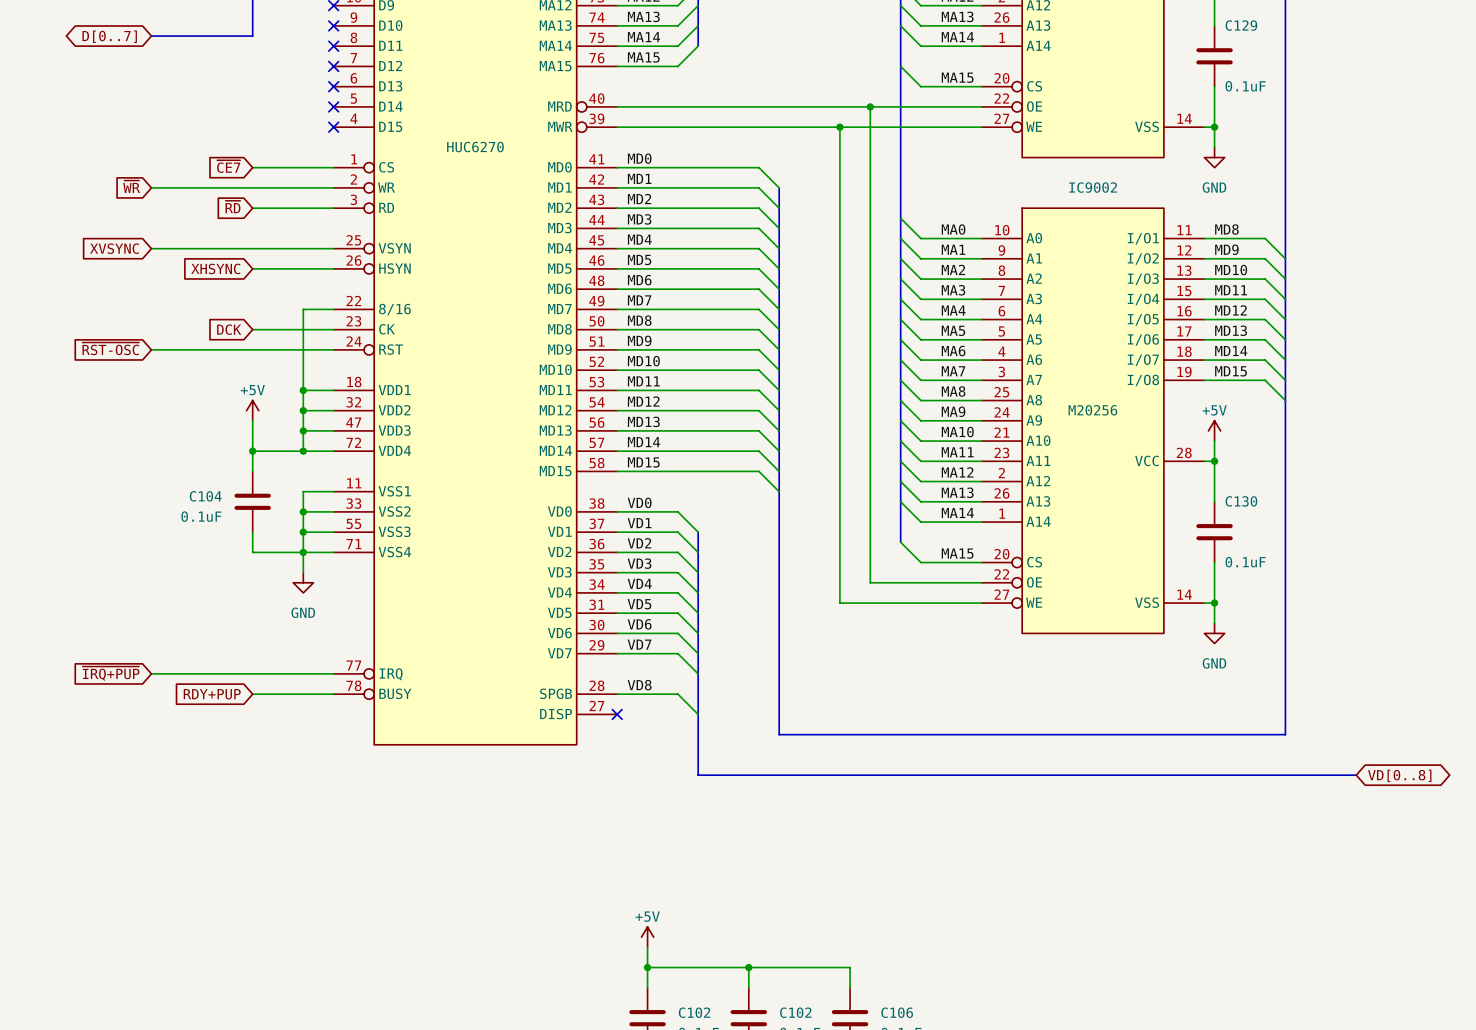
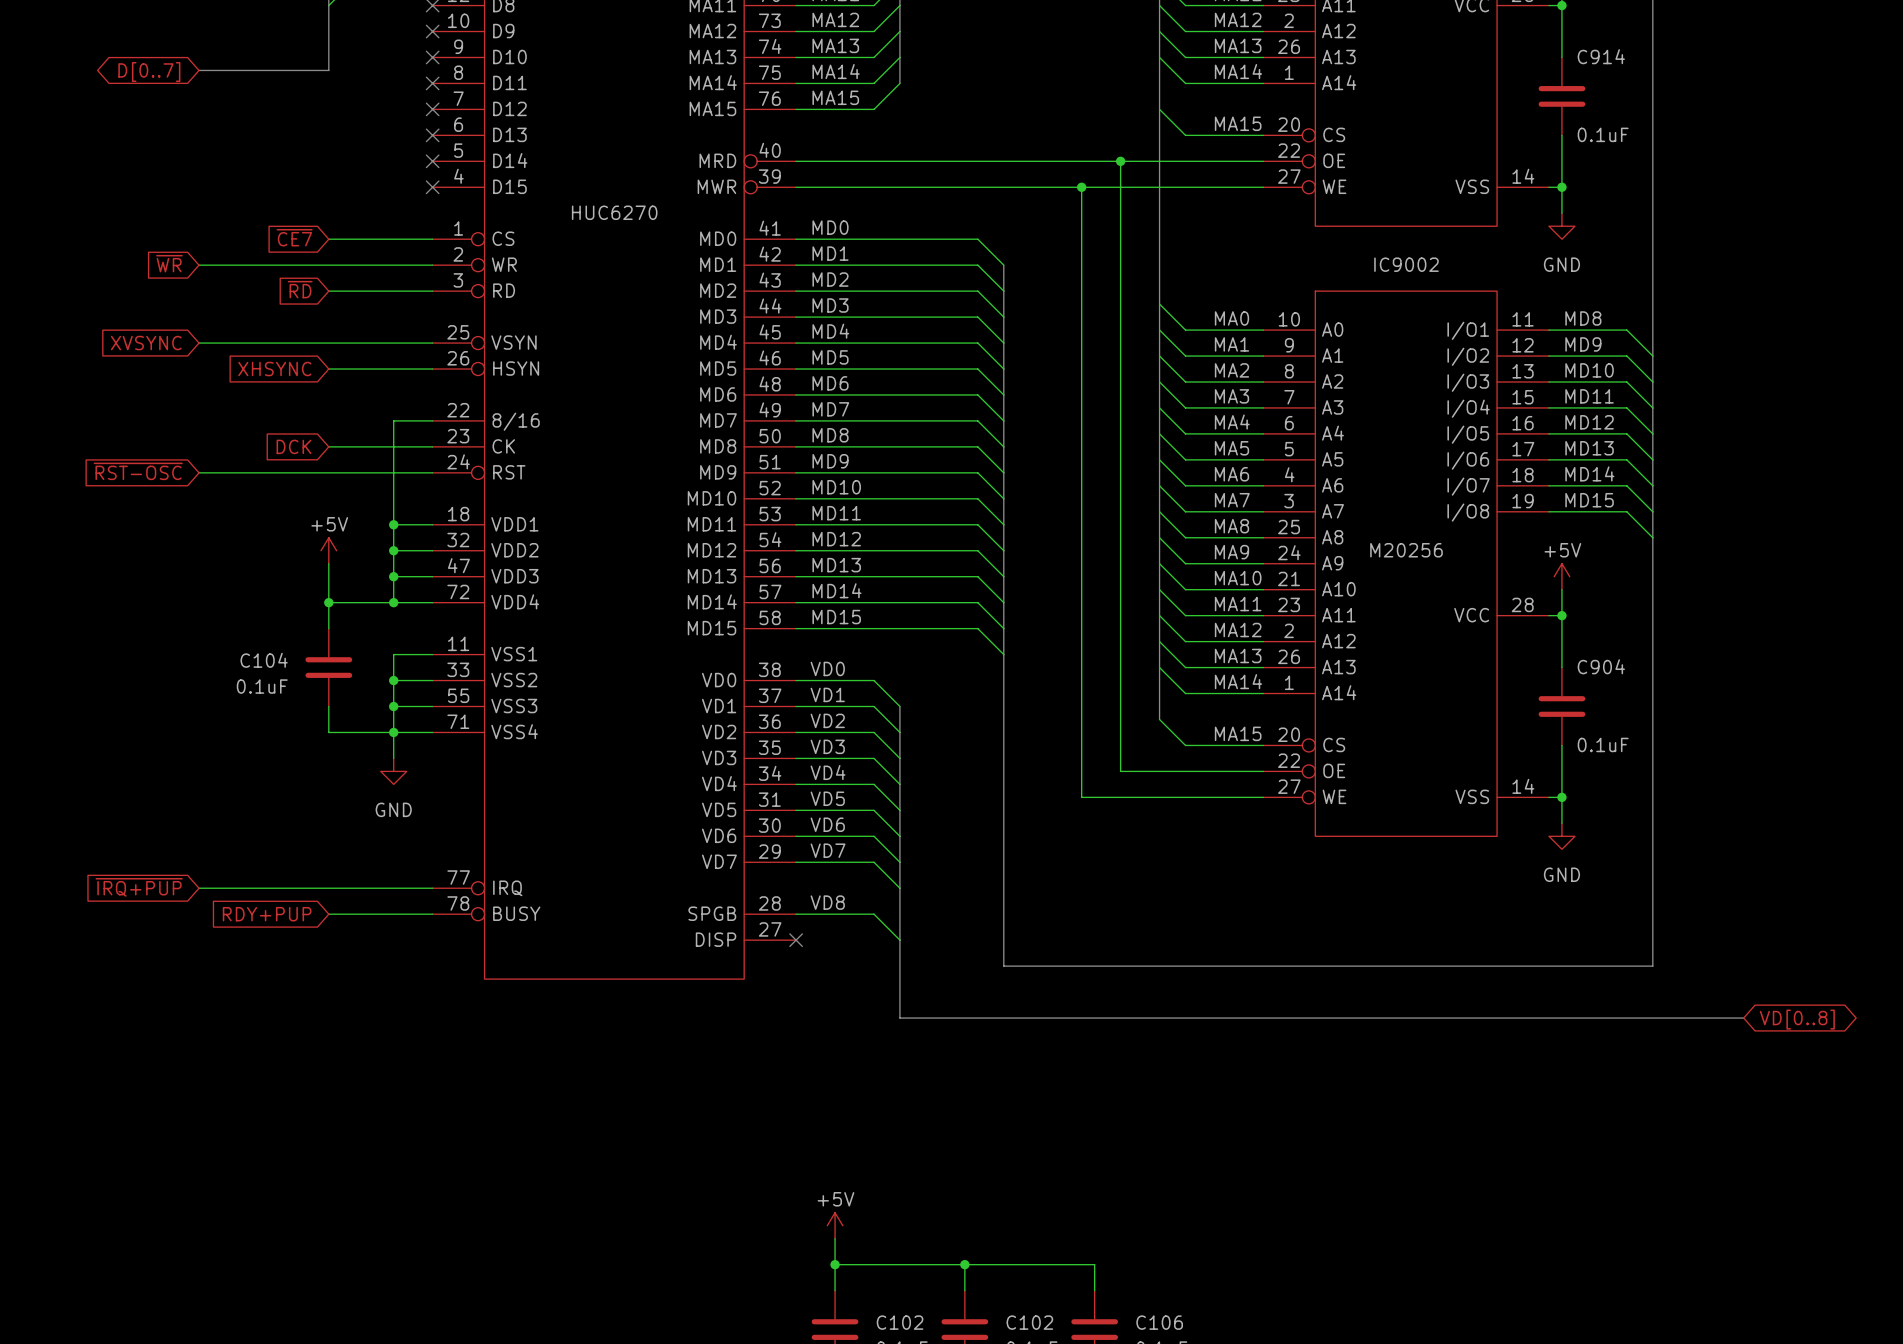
C129 name: C129 (1241, 25) -> C914 (1601, 56)
C130 name: C130 (1241, 501) -> C904 (1601, 666)

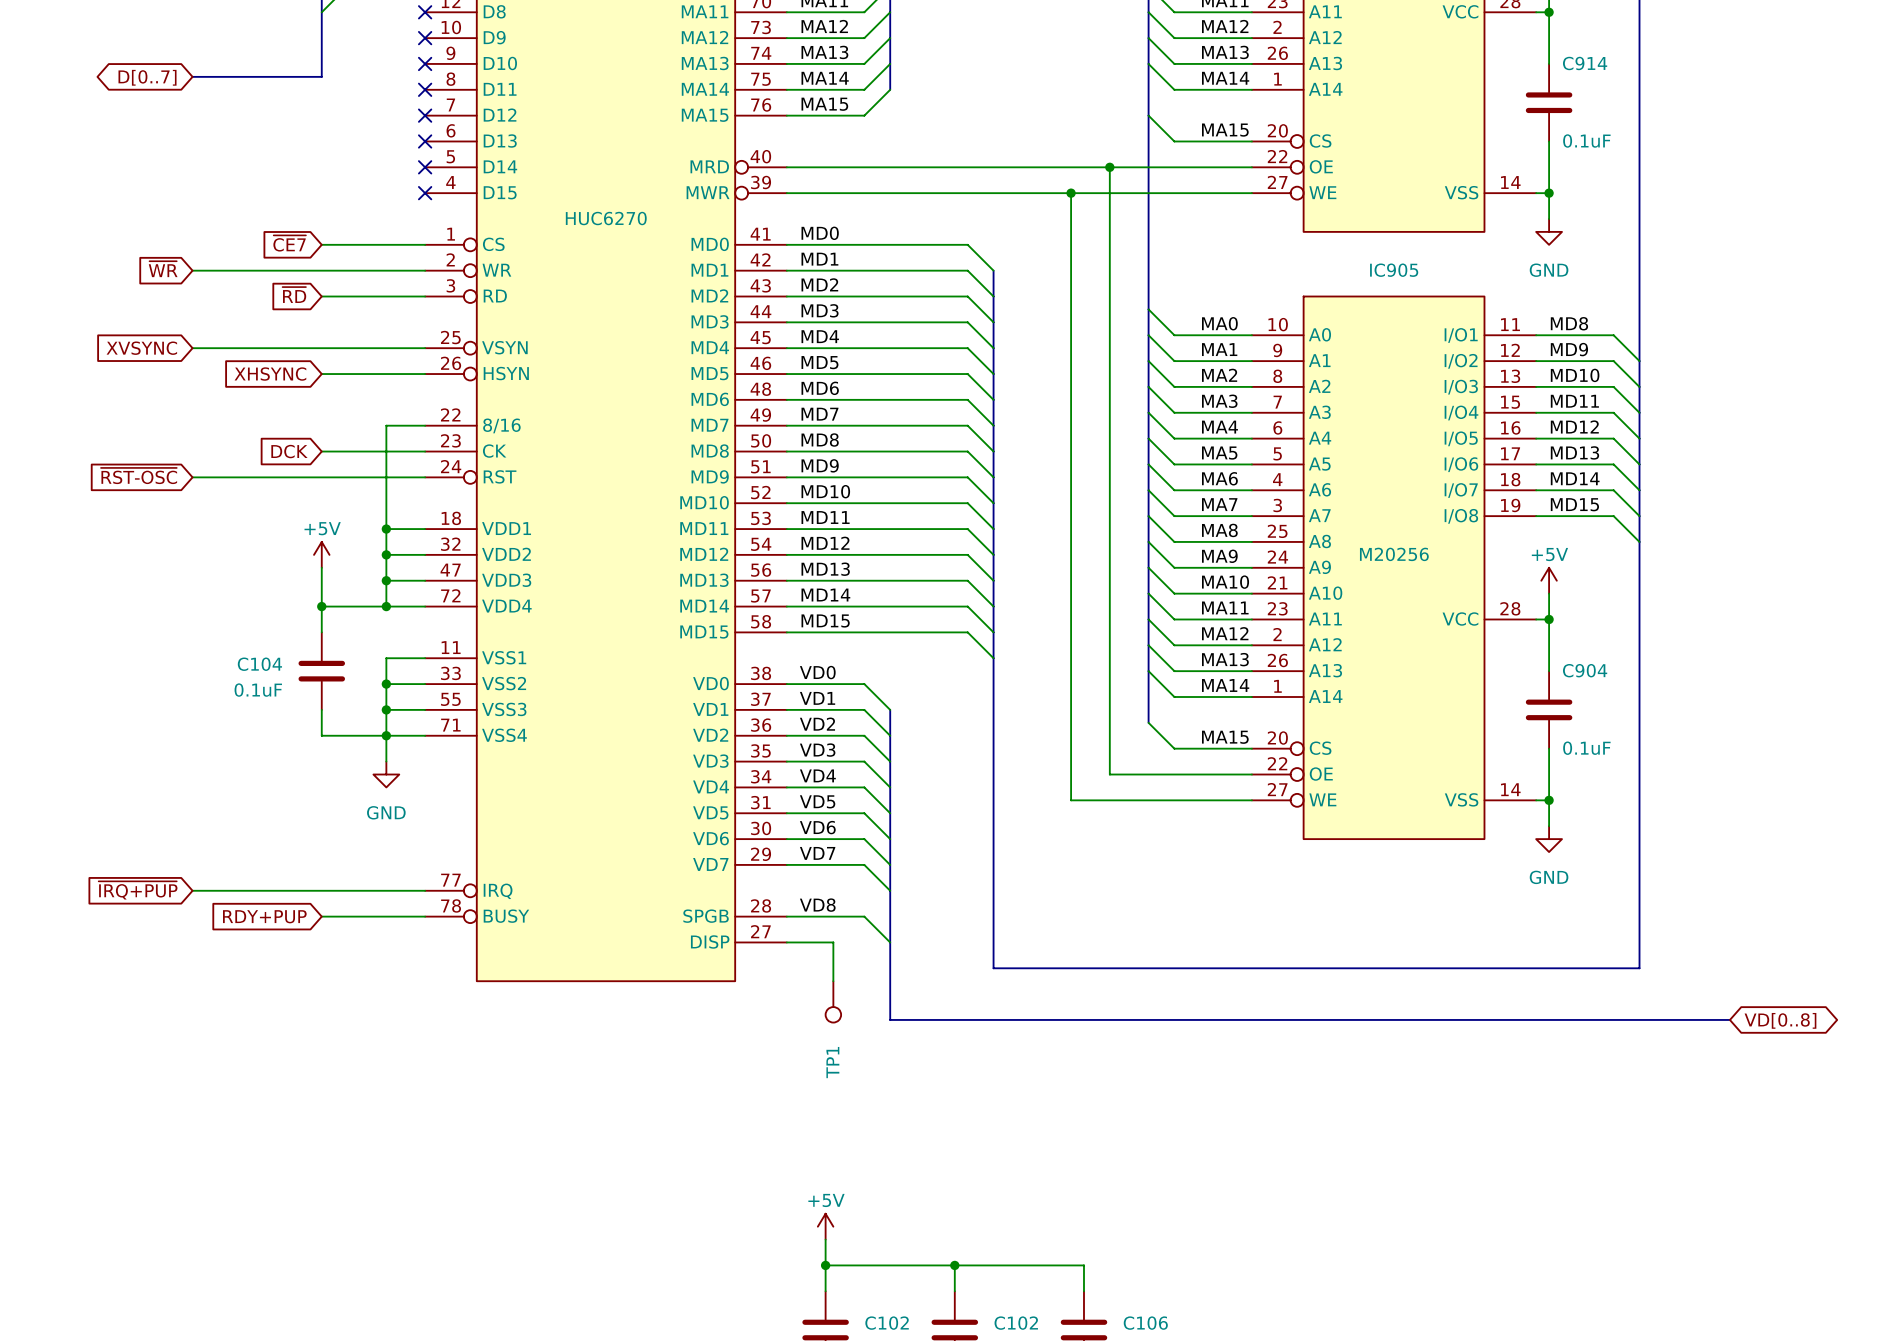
IC9002 name: IC9002 (1406, 264) -> IC905 (1394, 270)
wire: none -> (786, 942) (833, 942) (833, 981)
no-connect mark: (796, 940) -> none
TP1: none -> (833, 1001)

